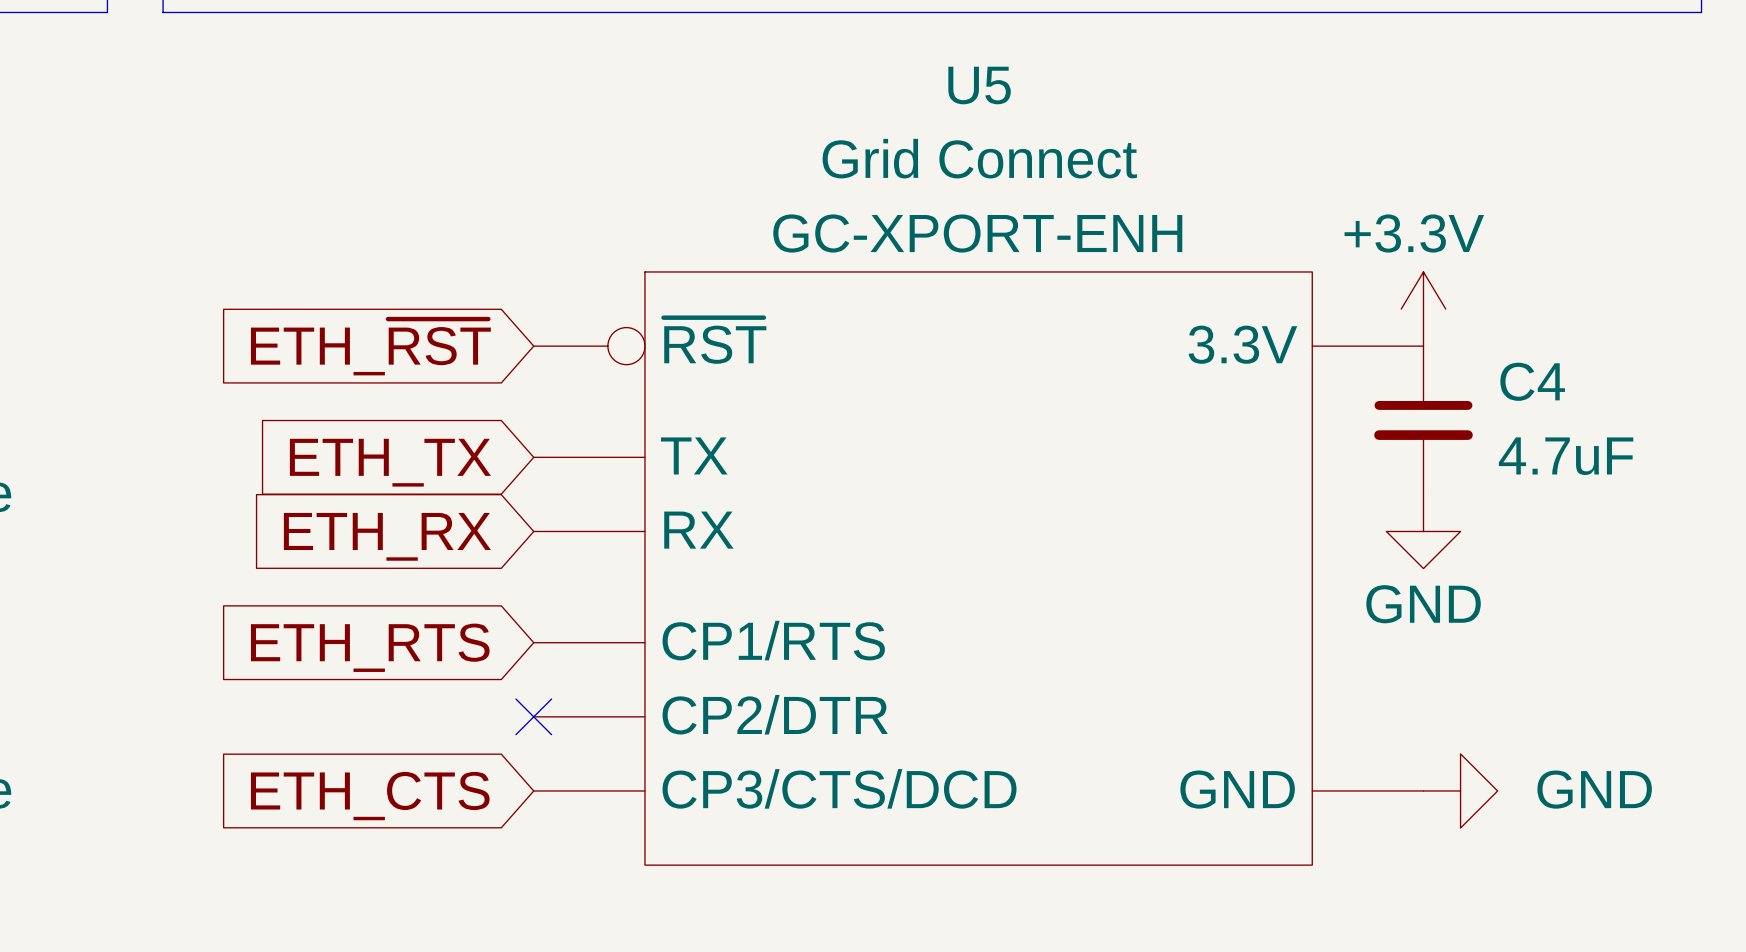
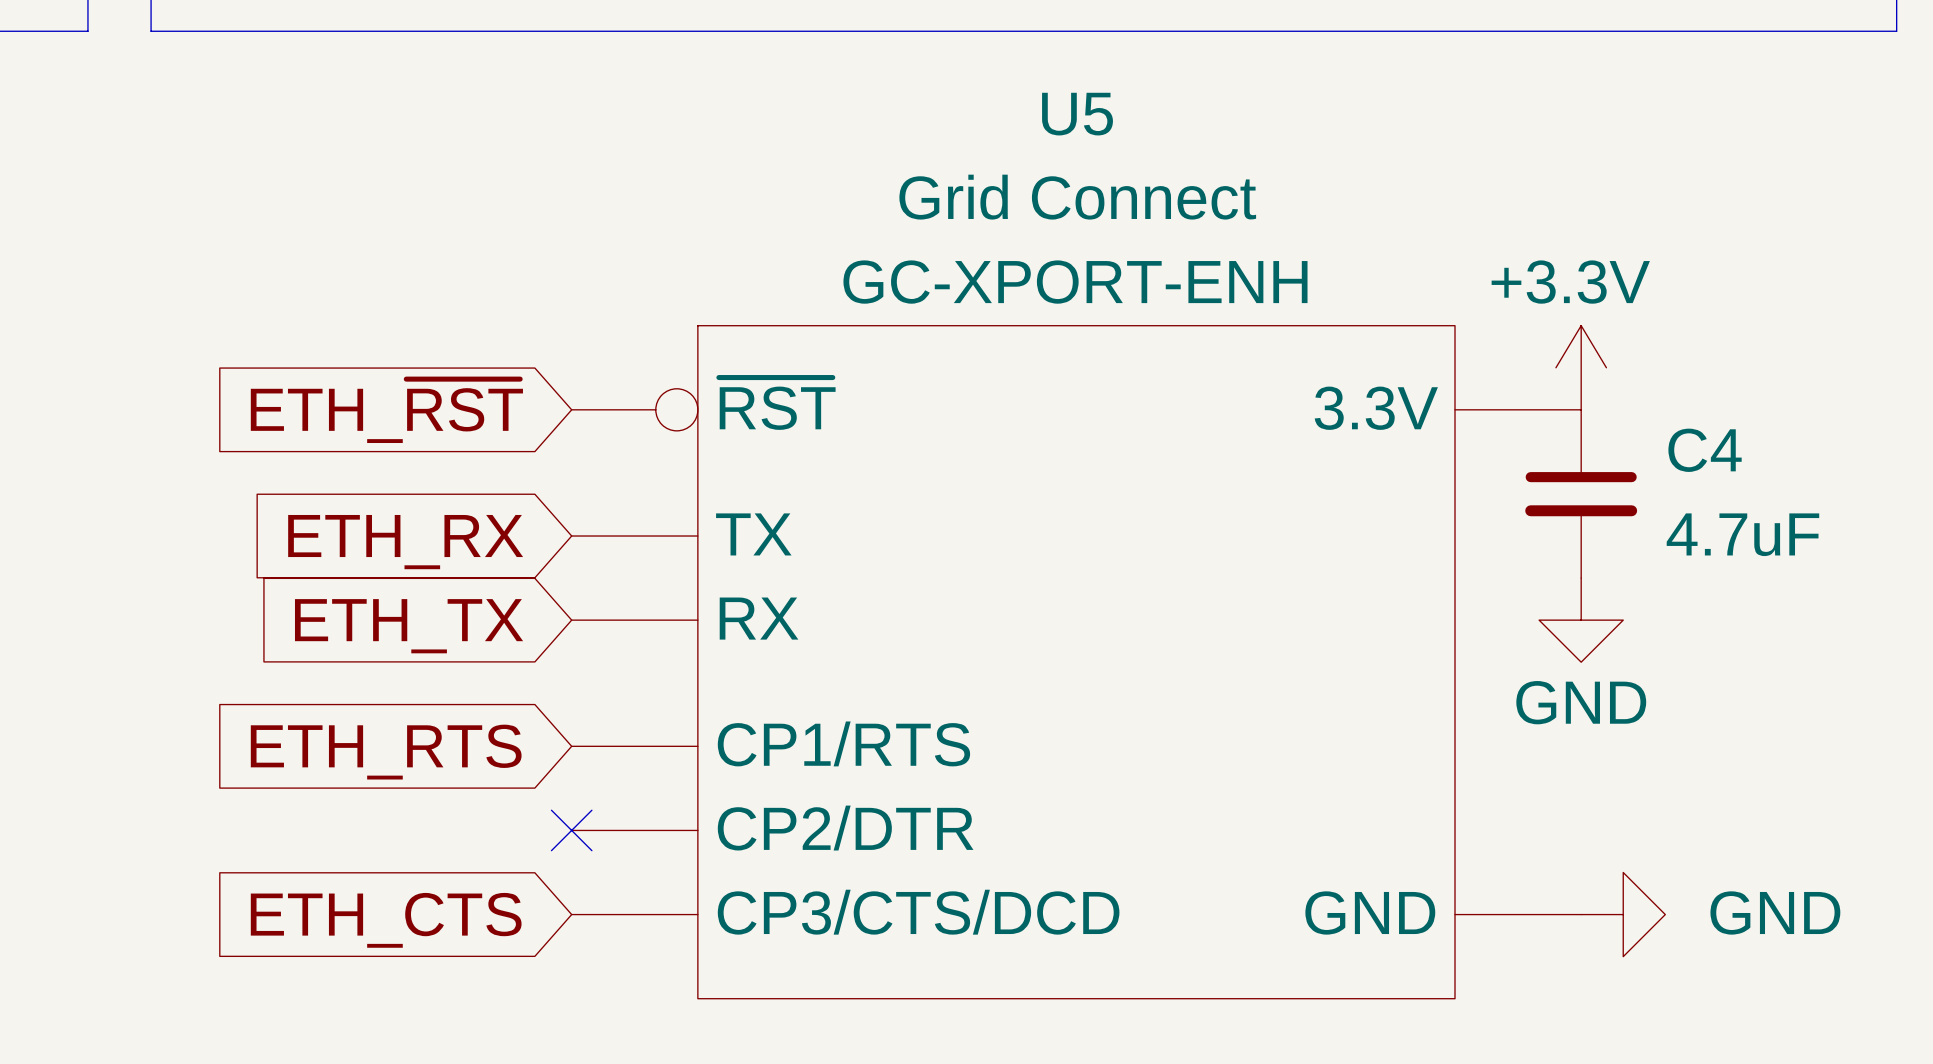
global label: ETH_TX (390, 462) -> ETH_RX (405, 542)
global label: ETH_RX (387, 536) -> ETH_TX (409, 626)

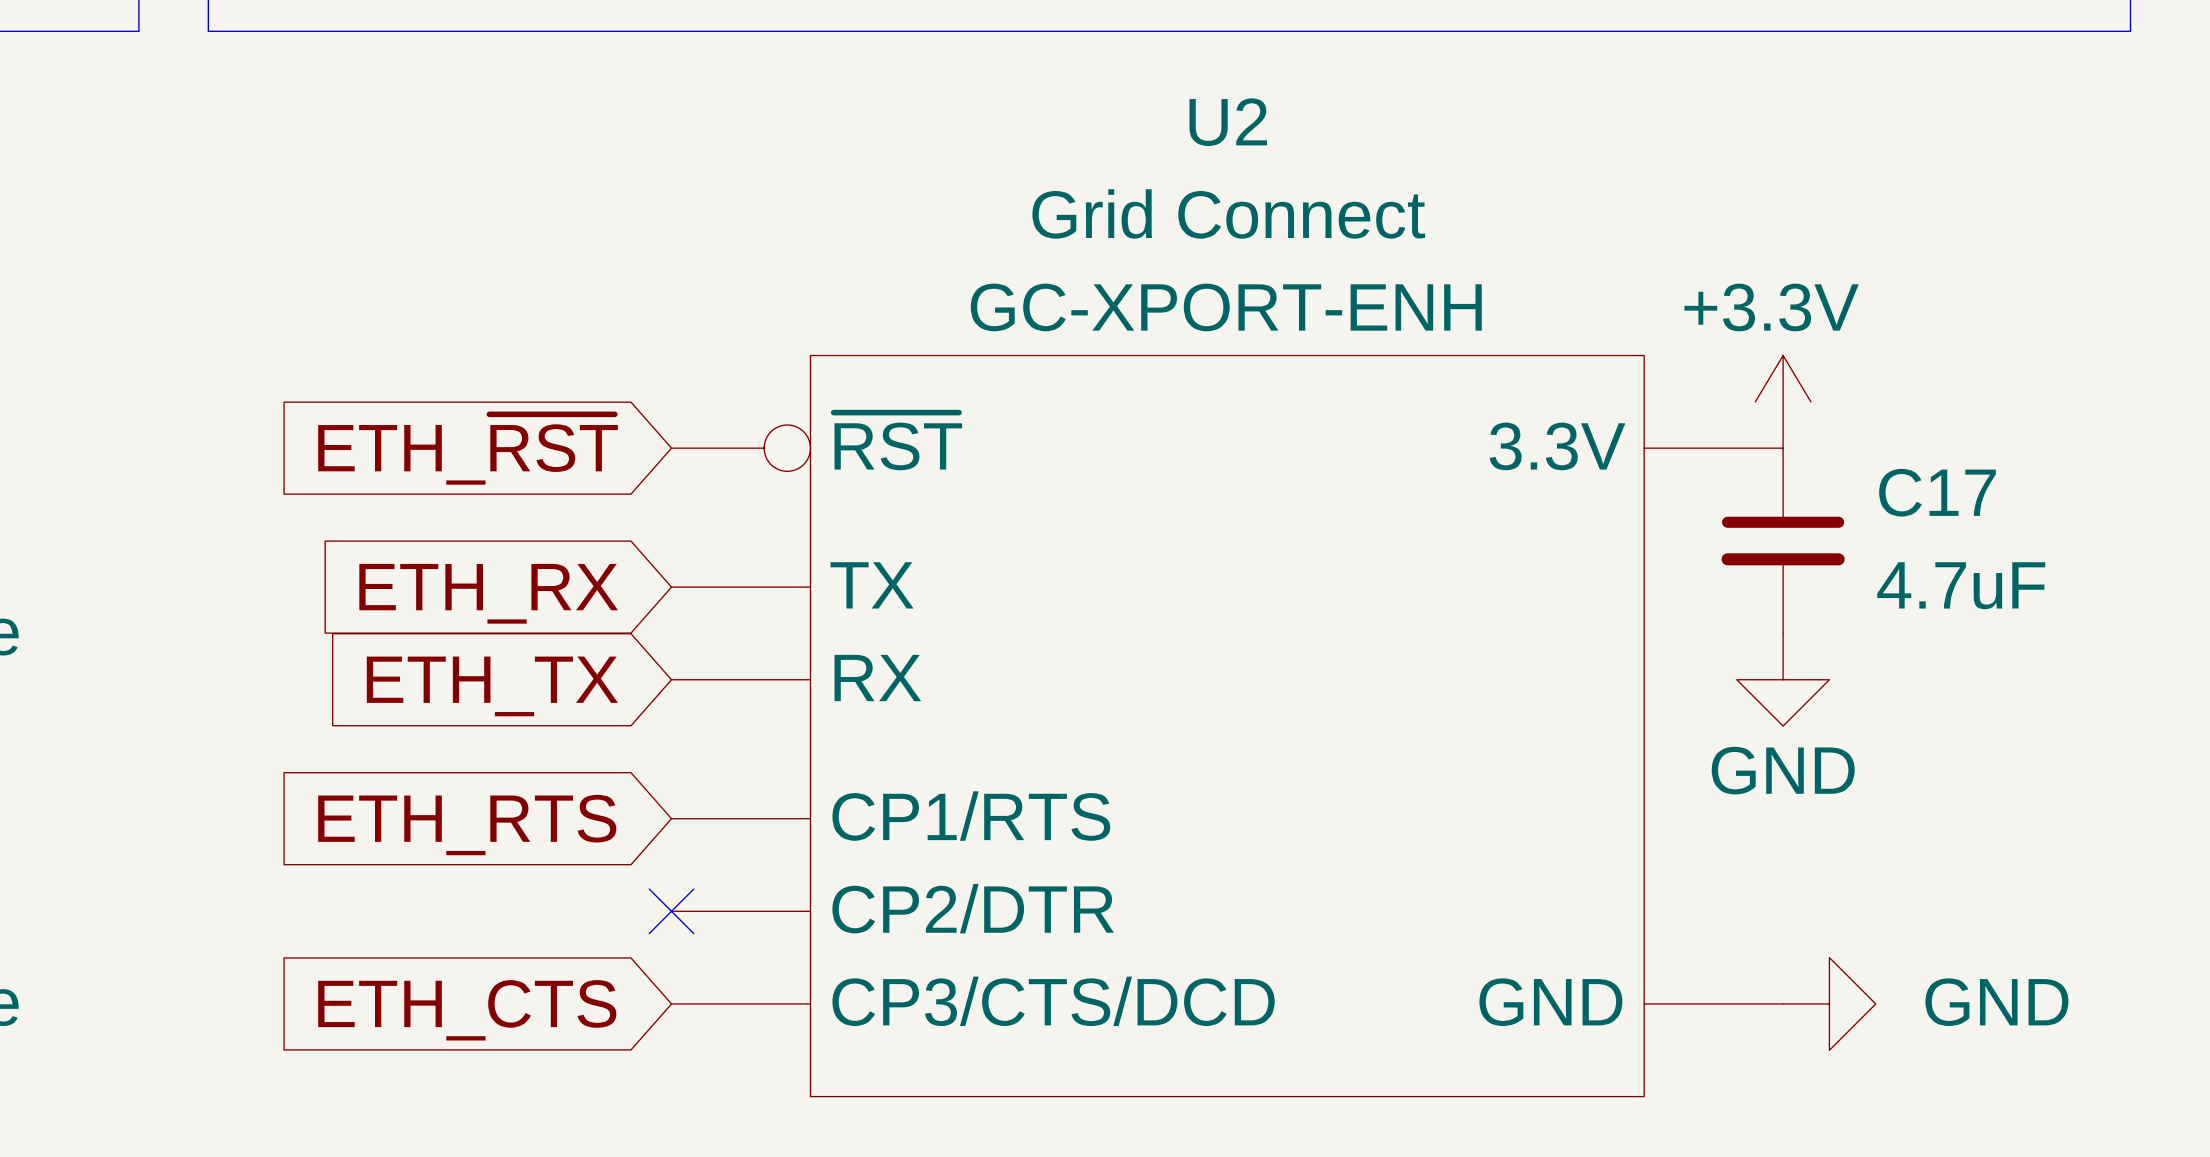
U5 name: U5 (1077, 114) -> U2 (1228, 122)
C4 name: C4 (1705, 450) -> C17 (1937, 492)

